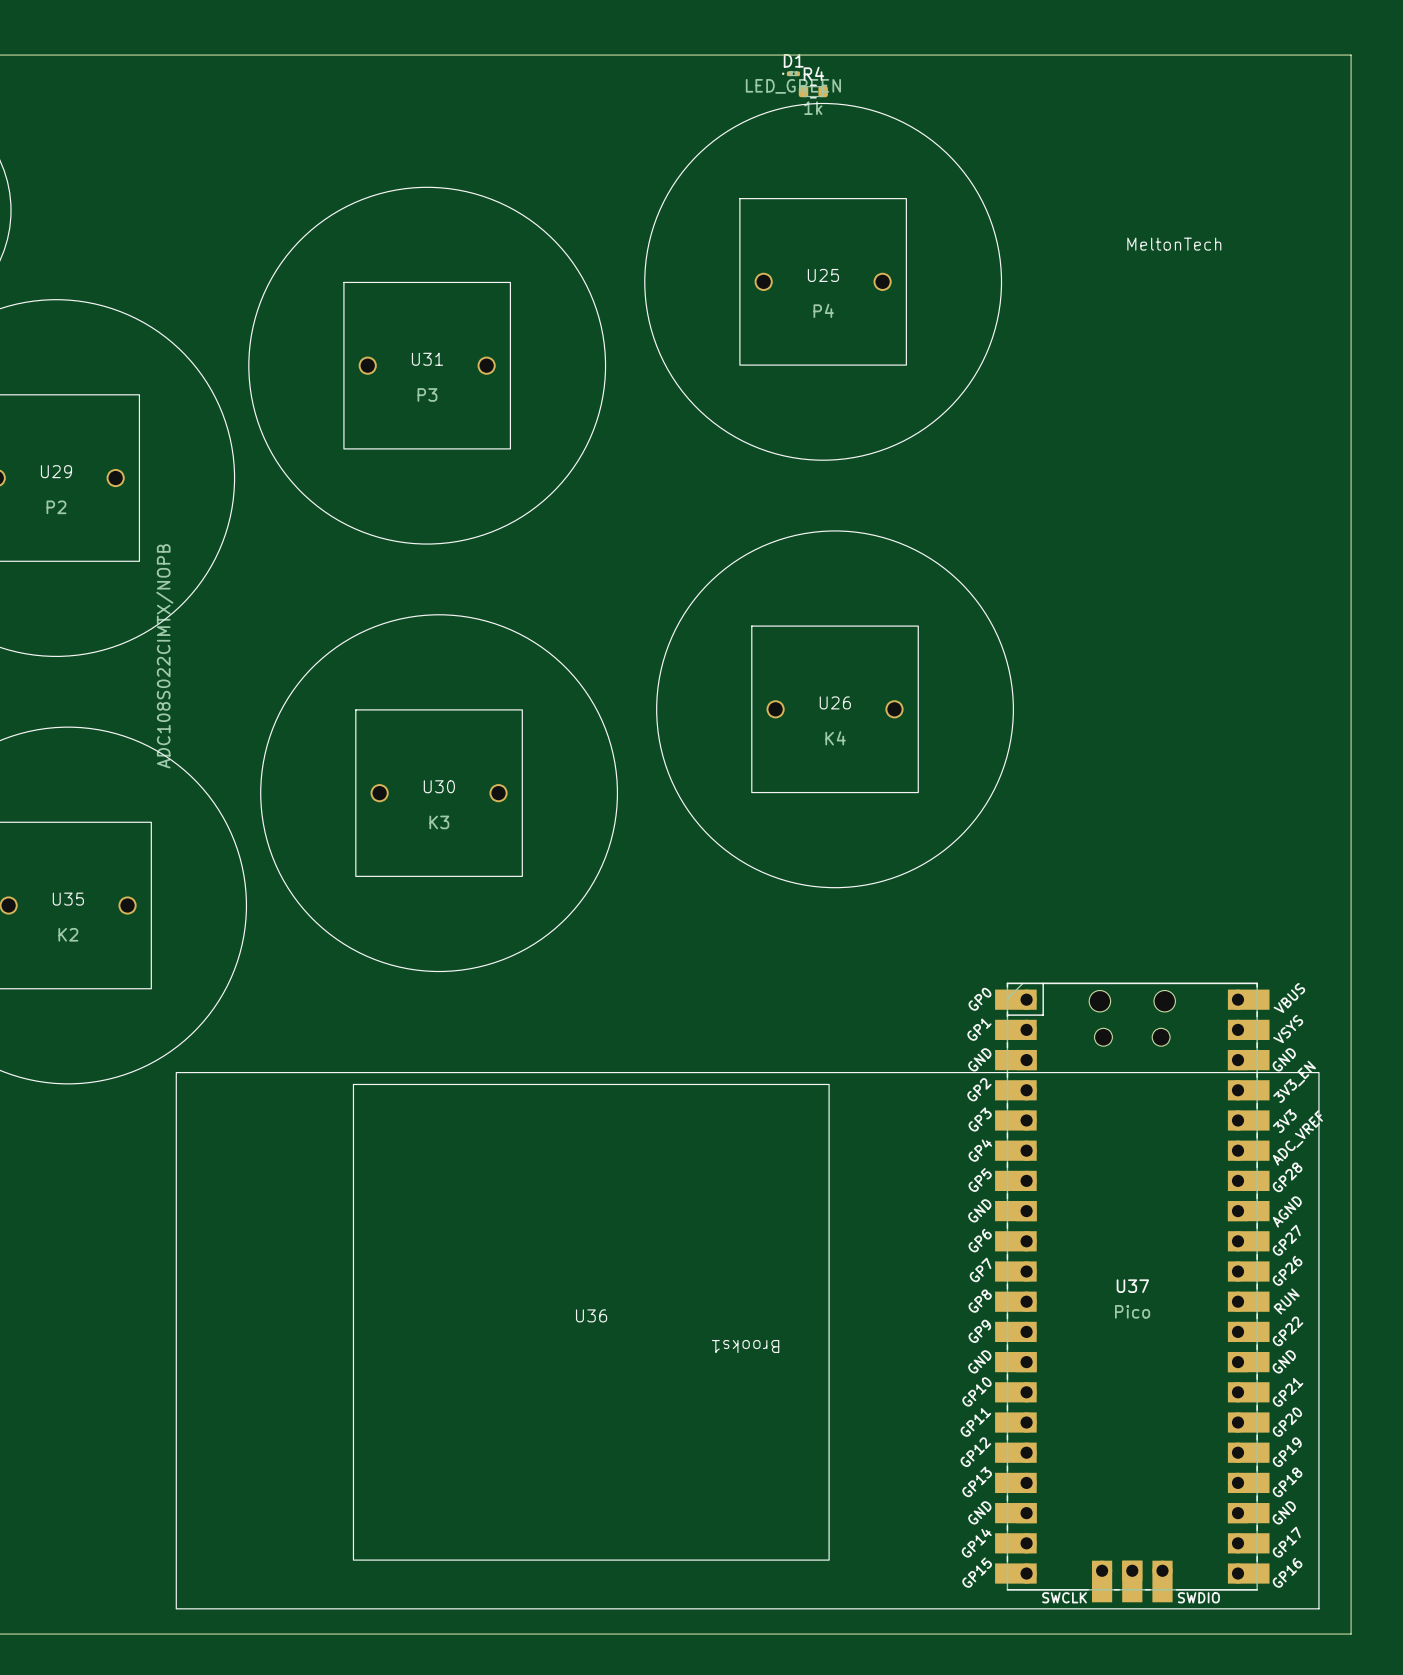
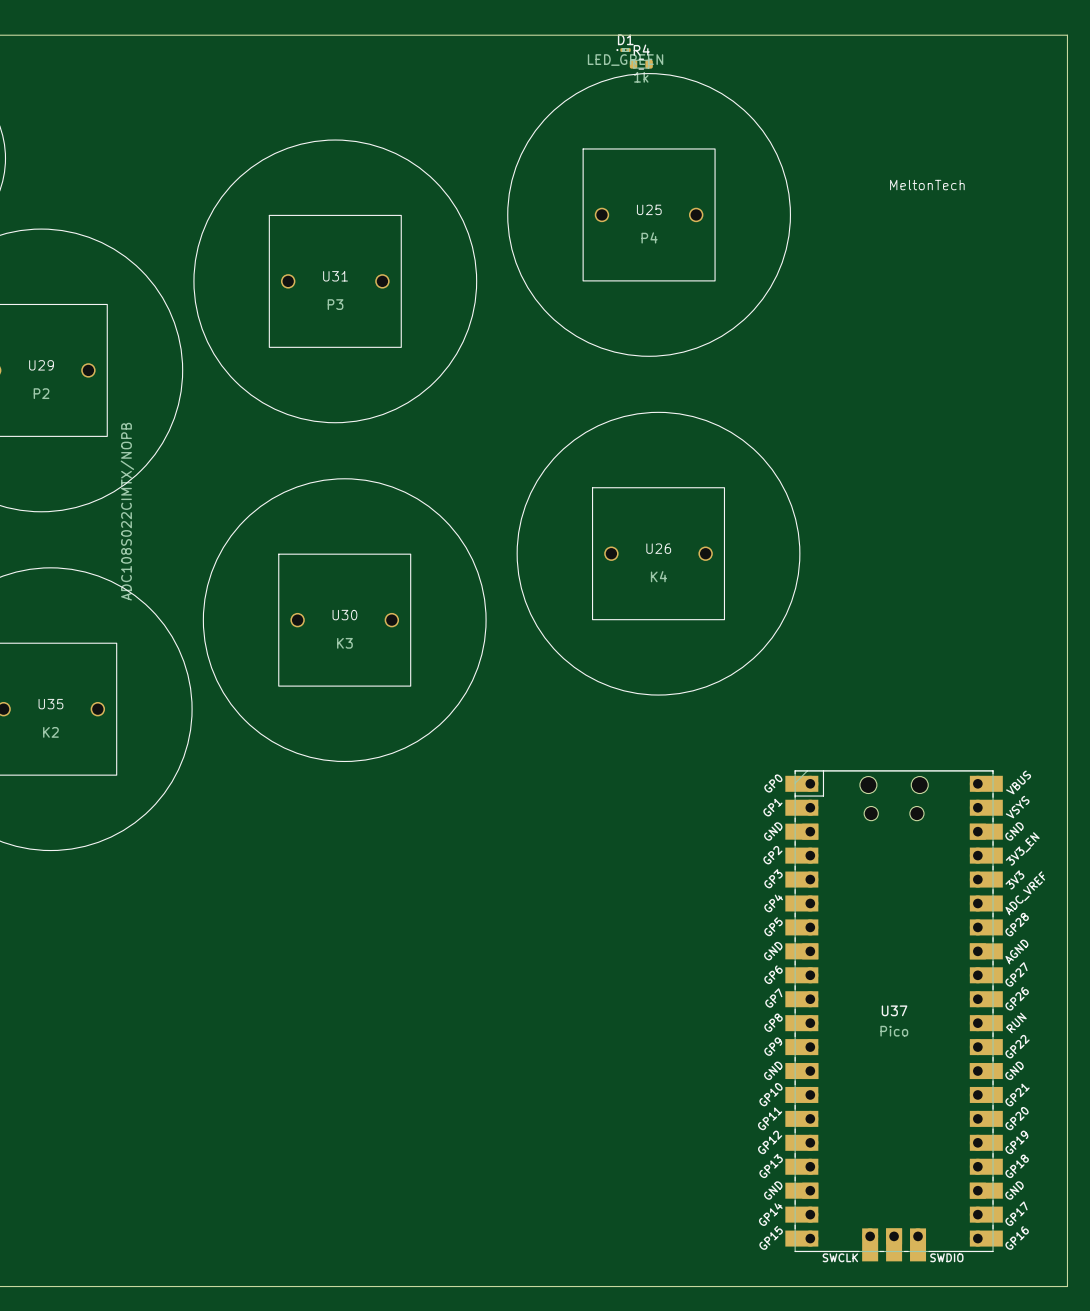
U36: (591, 1322) -> none
Brooks1: (747, 1340) -> none

